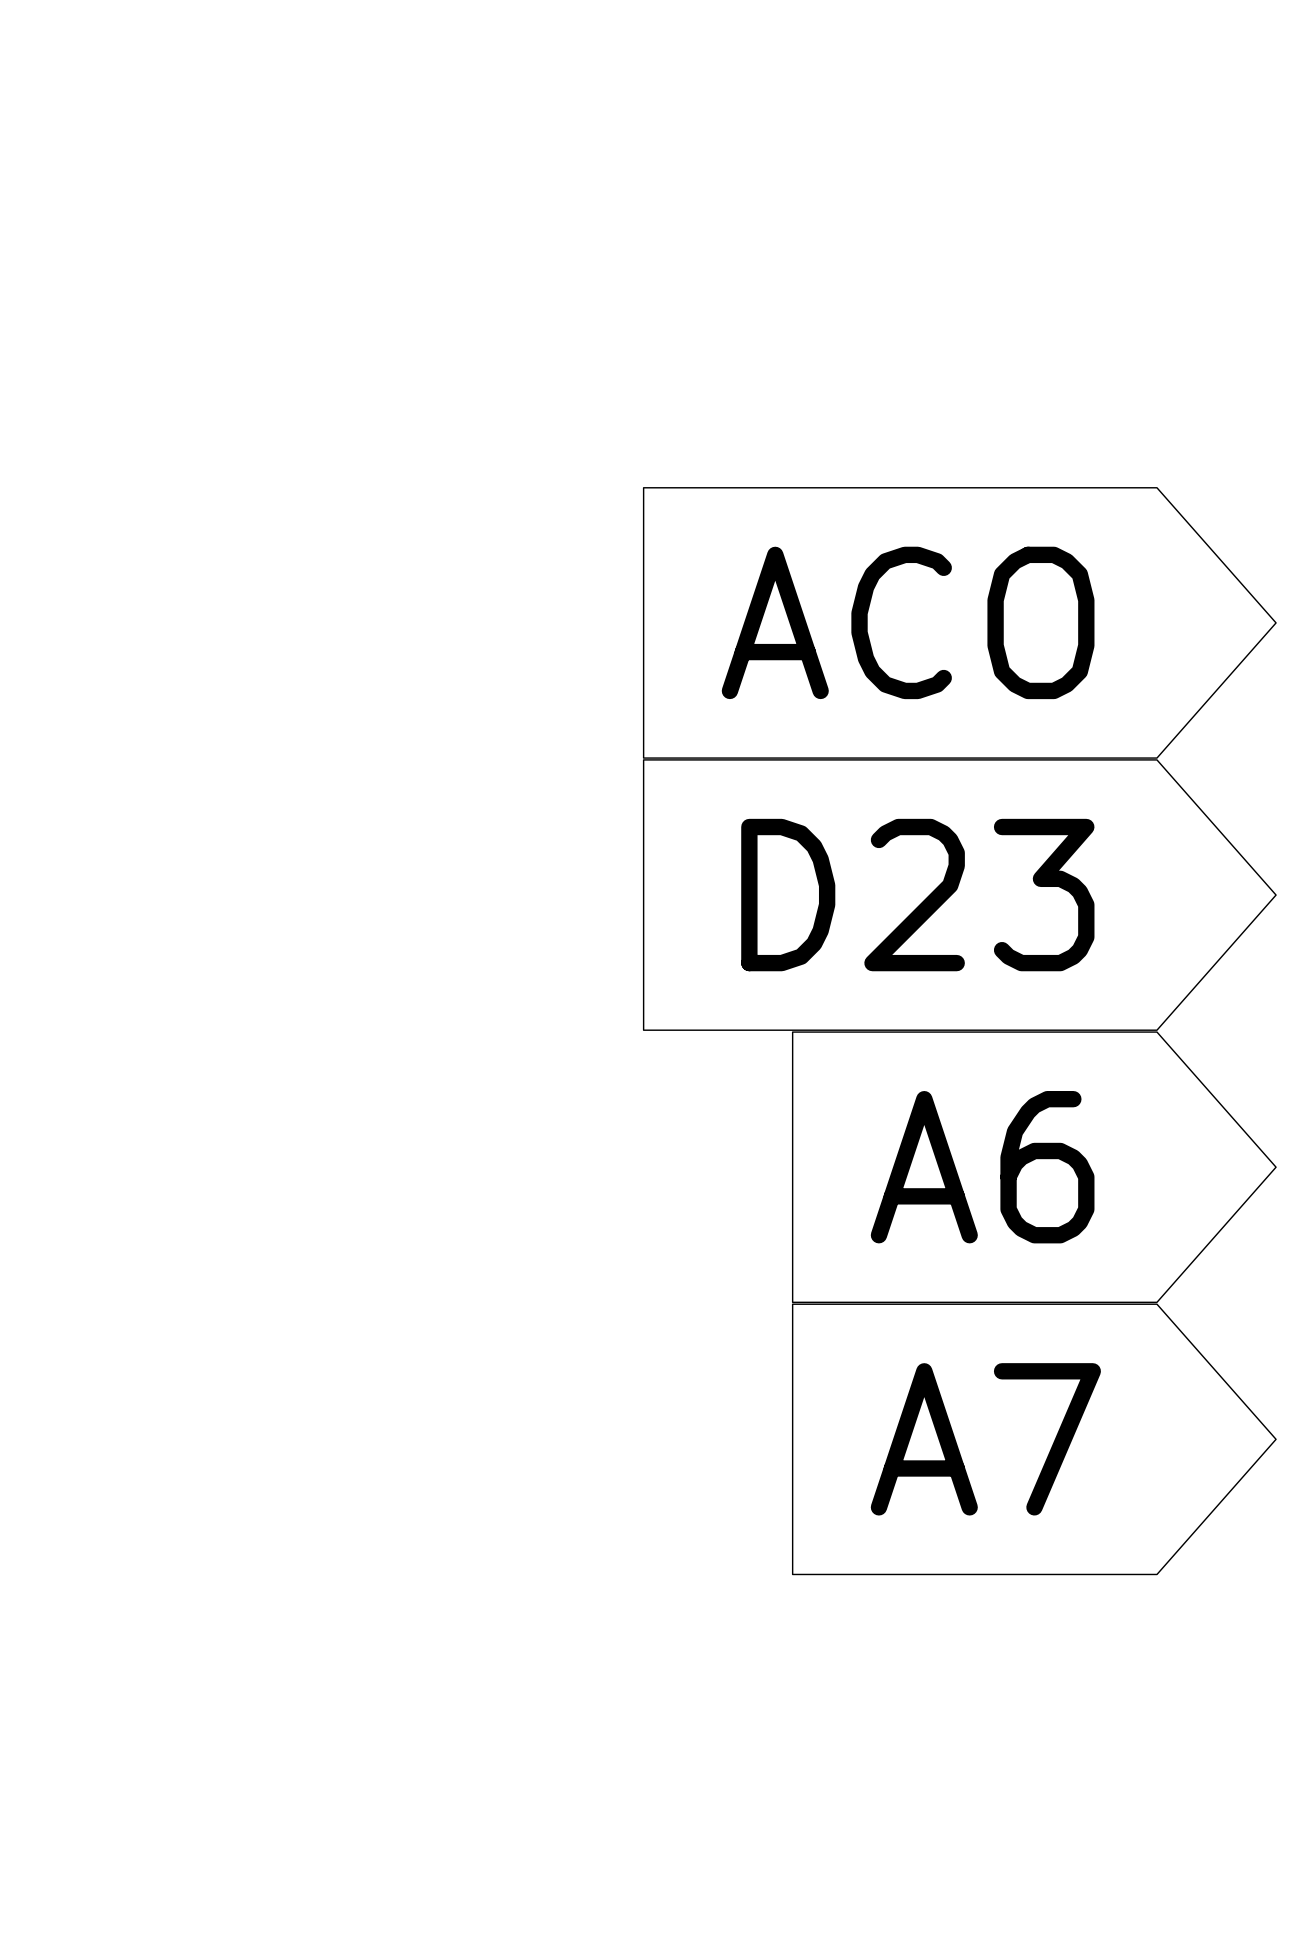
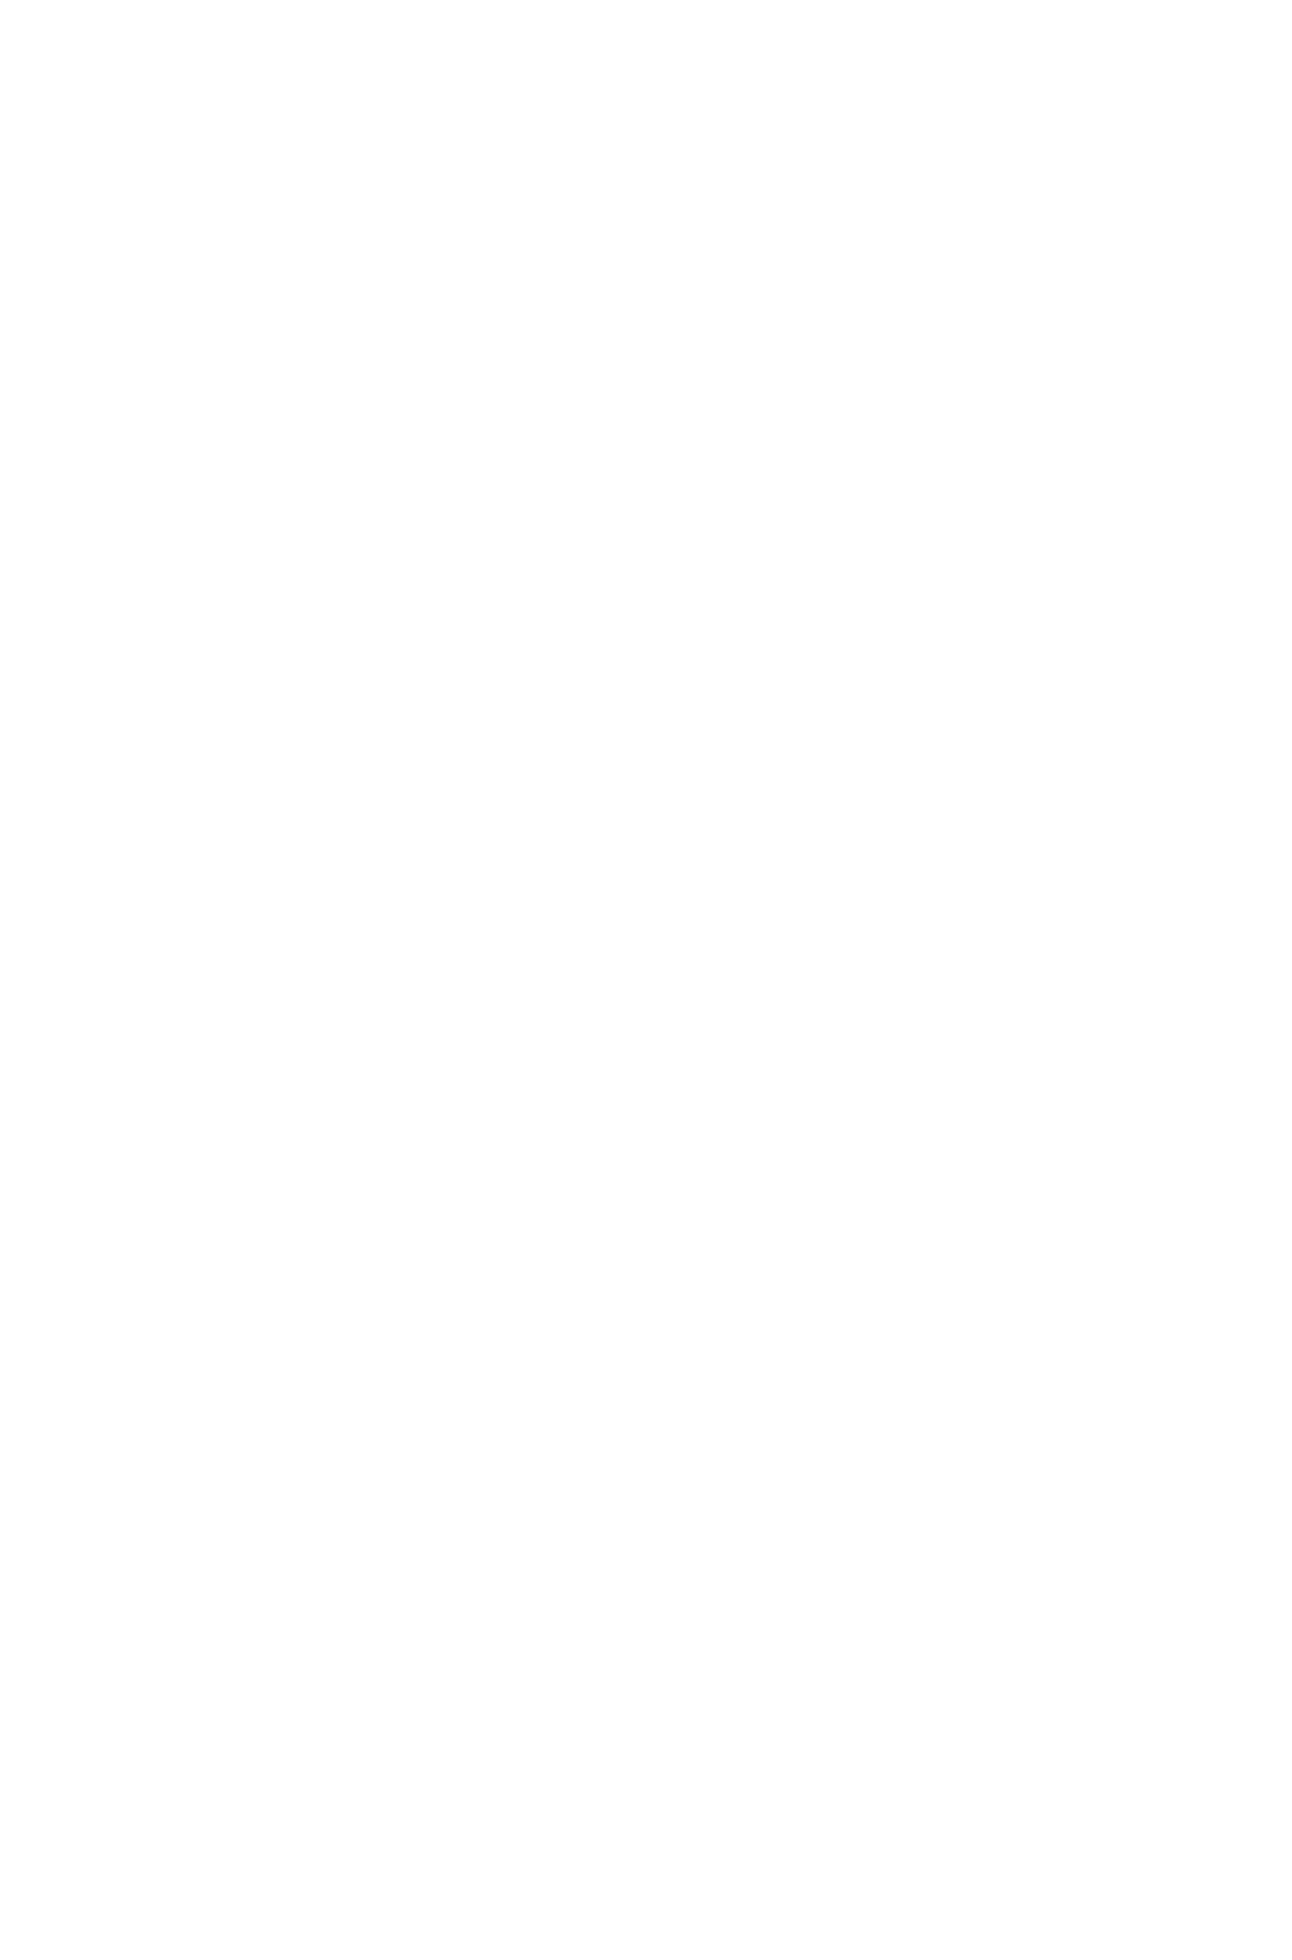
global label: ACO (908, 622) -> none
global label: D23 (917, 895) -> none
global label: A6 (982, 1167) -> none
global label: A7 (985, 1439) -> none

